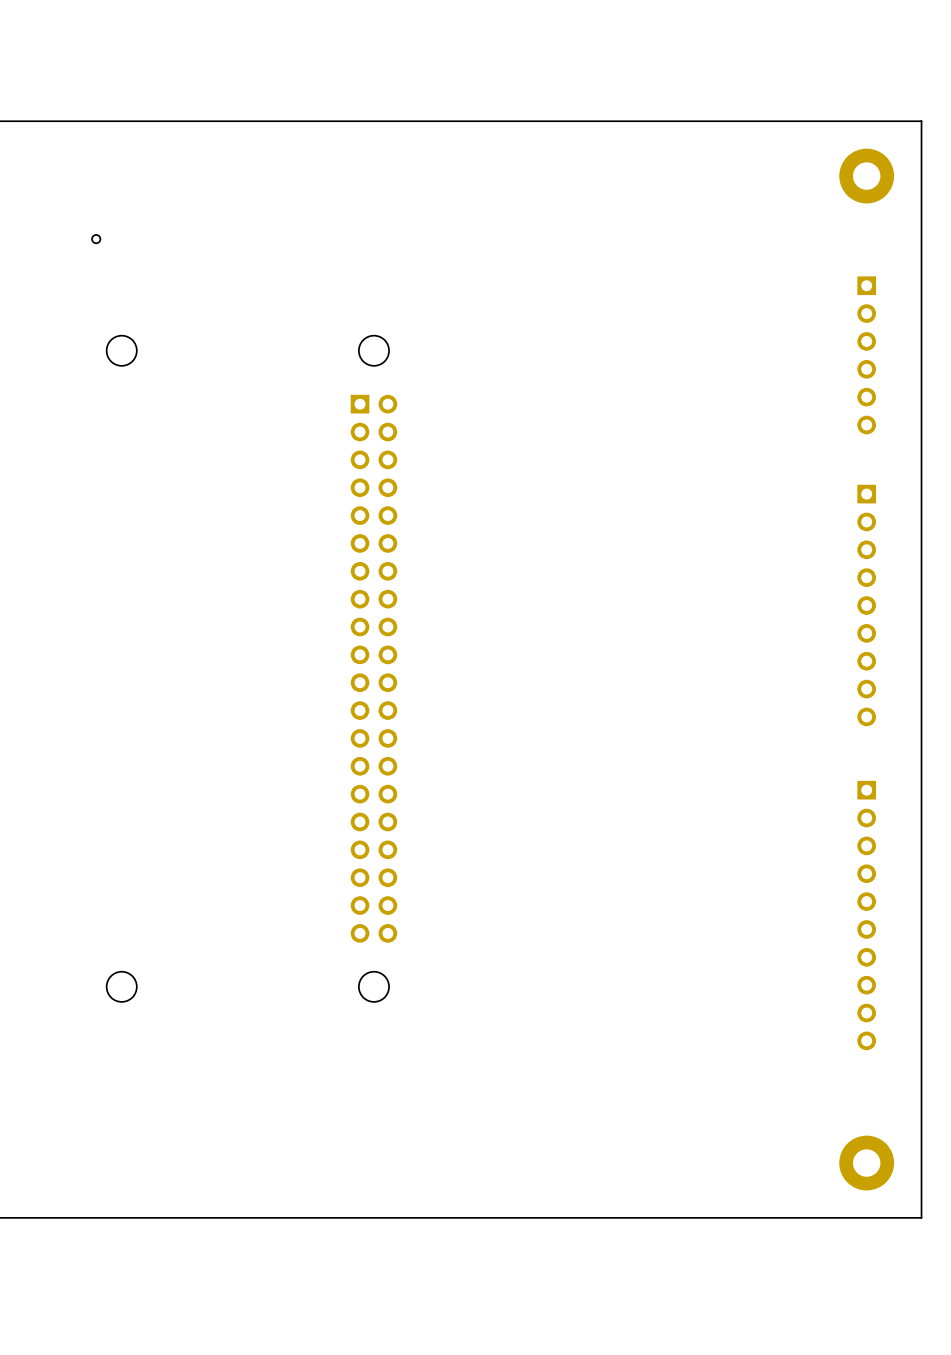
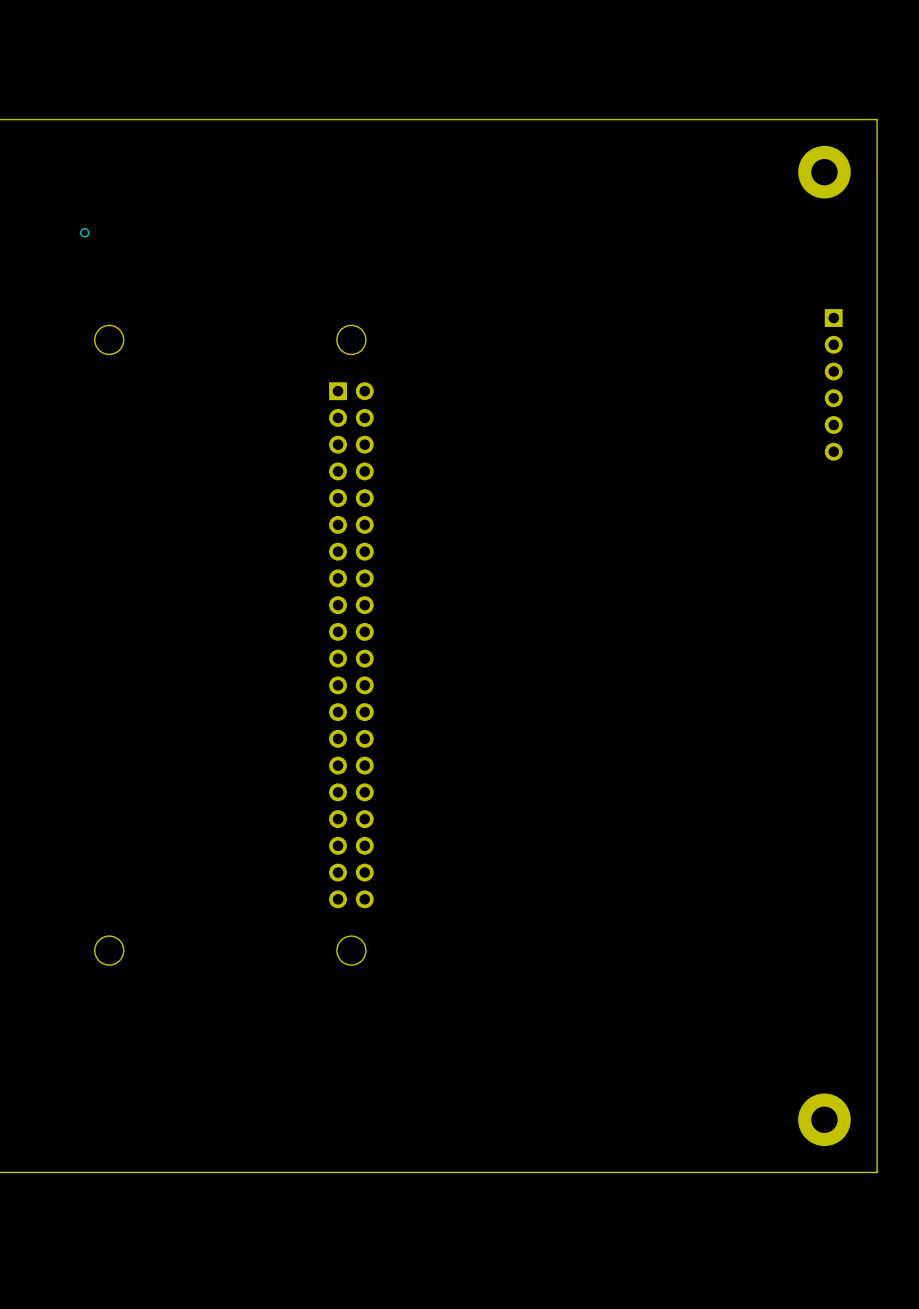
part position: (866, 355) -> (833, 384)
part: (866, 605) -> none
part: (866, 915) -> none

